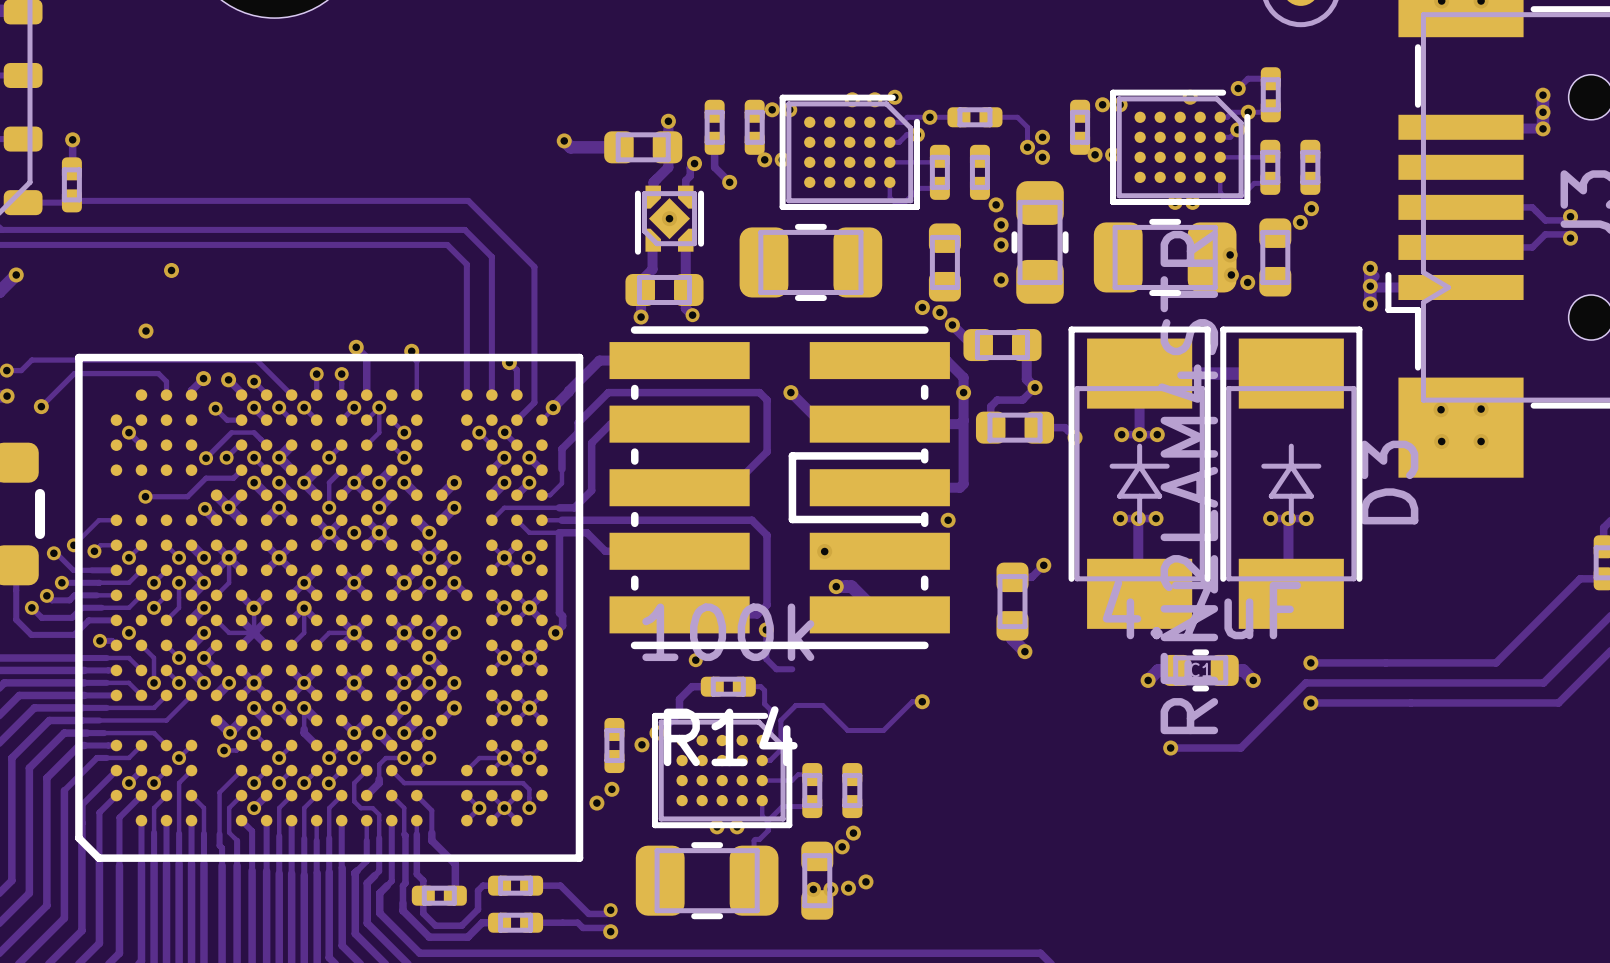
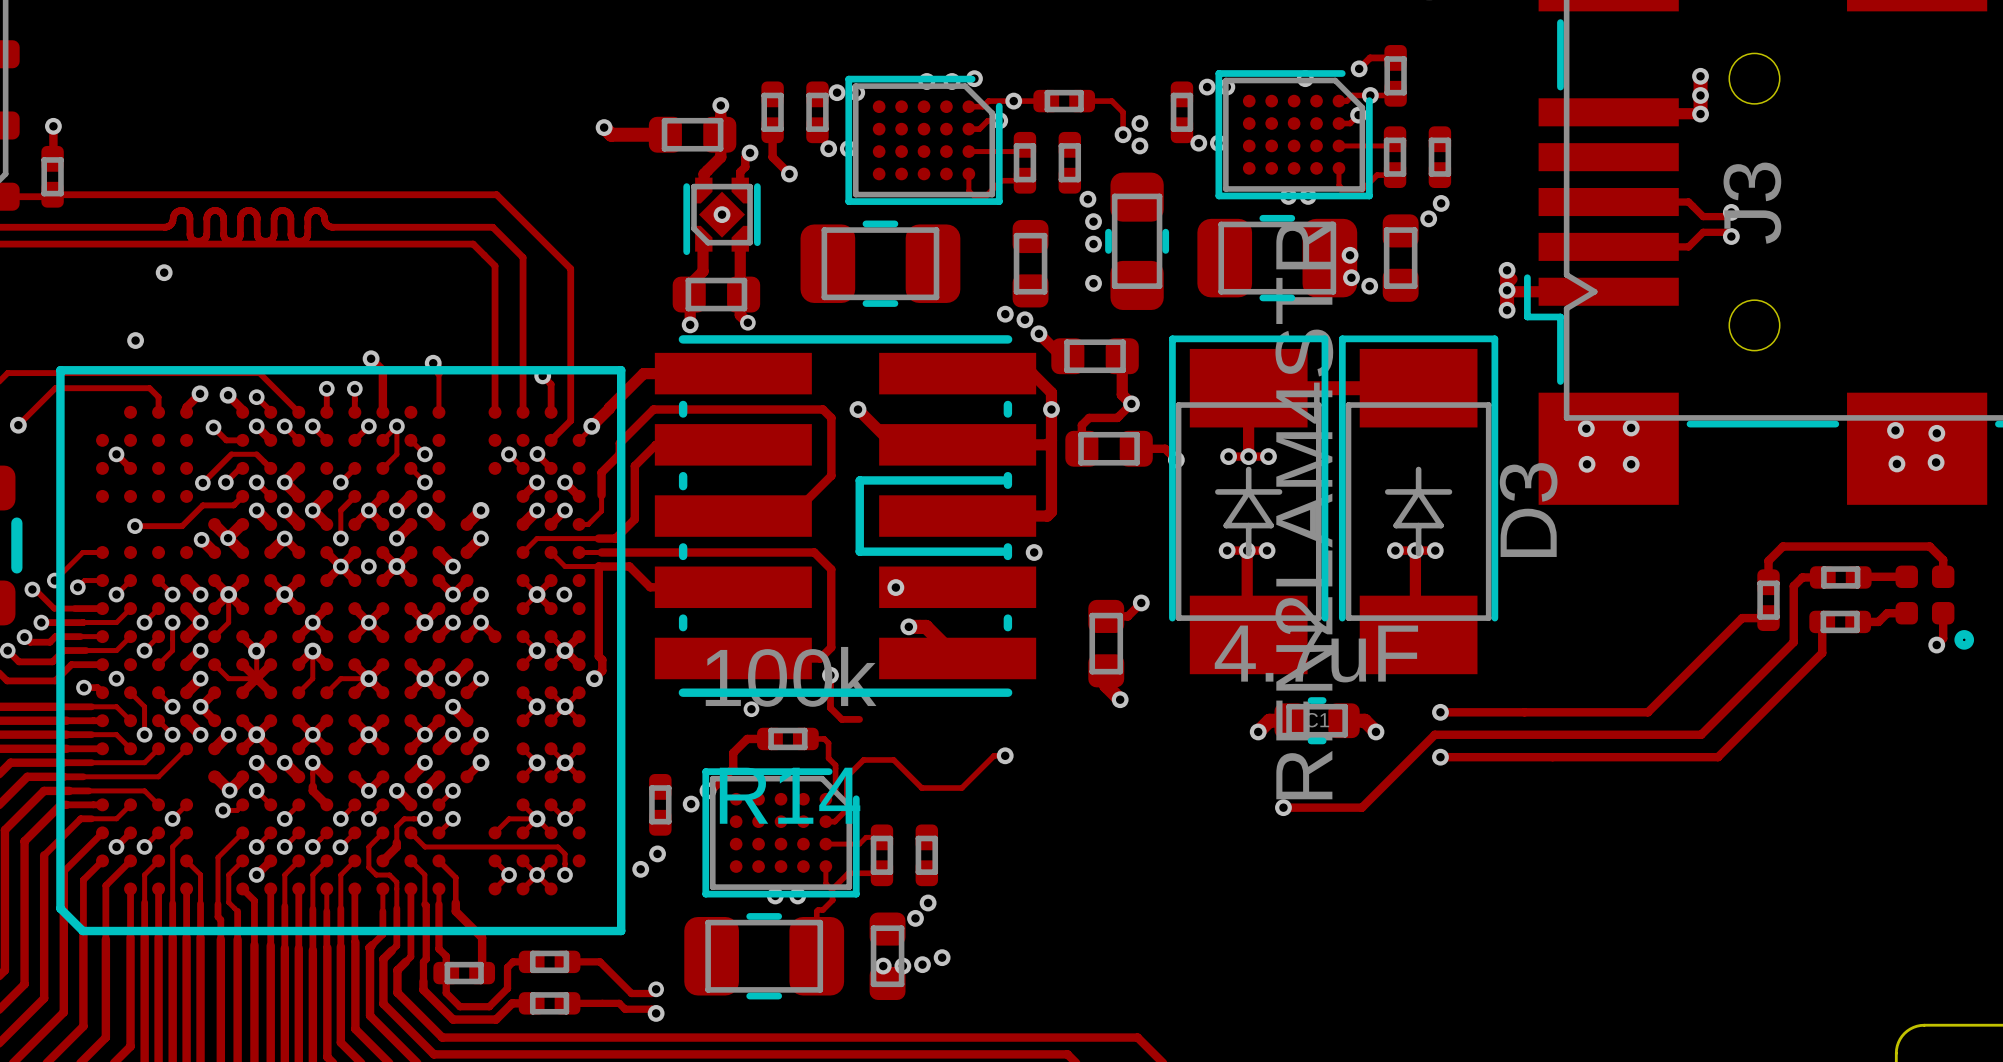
track: (172, 229) (322, 229) -> (164, 227) (169, 225) (174, 213) (181, 210) (189, 215) (190, 235) (192, 239) (196, 241) (202, 240) (206, 237) (207, 216) (209, 212) (215, 210) (222, 215) (223, 235) (229, 241) (236, 240) (239, 237) (240, 216) (246, 210) (252, 211) (256, 215) (257, 235) (262, 241) (270, 240) (273, 237) (274, 216) (280, 210) (286, 211) (290, 215) (291, 235) (296, 241) (303, 240) (307, 237) (307, 216) (312, 211) (321, 212) (326, 224) (332, 227)

